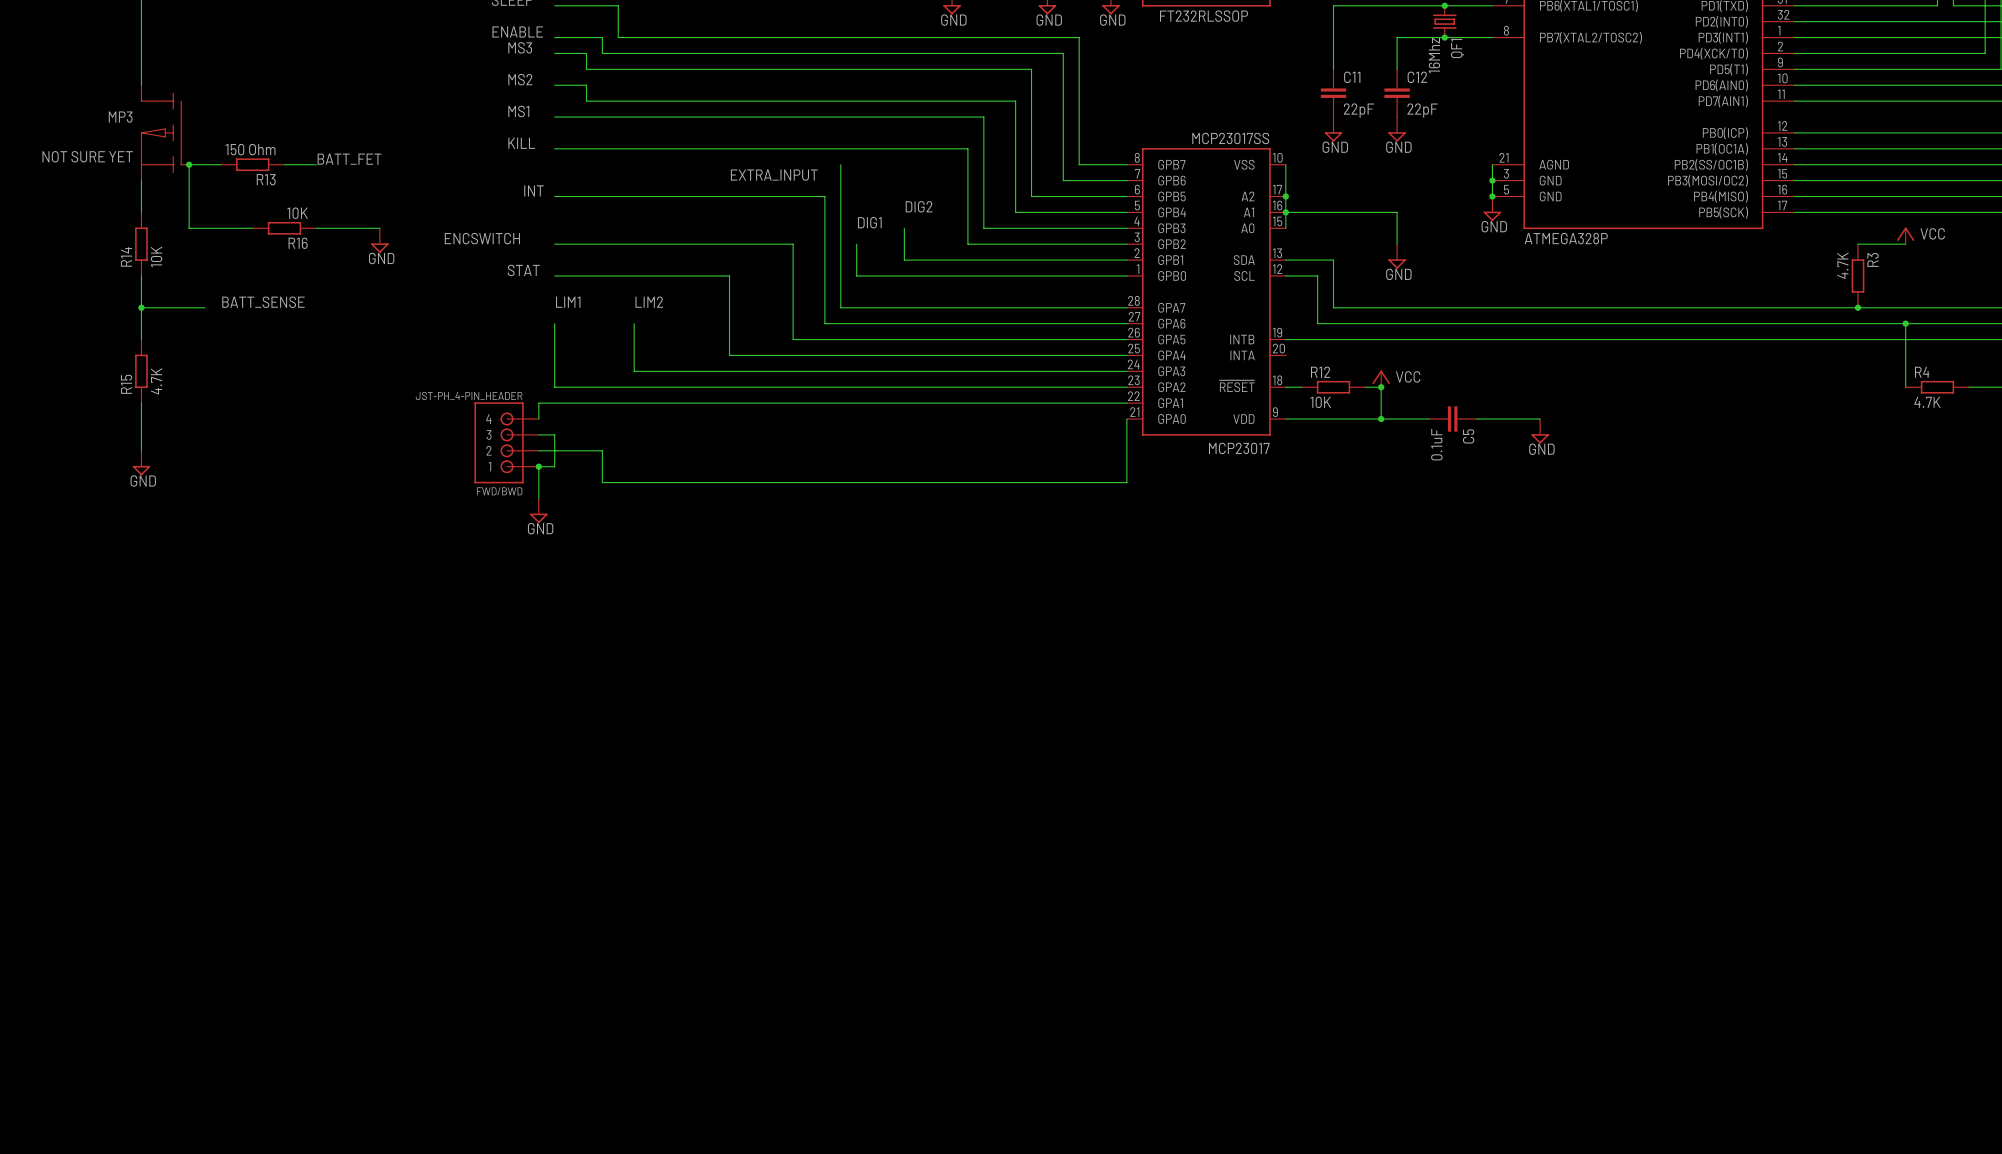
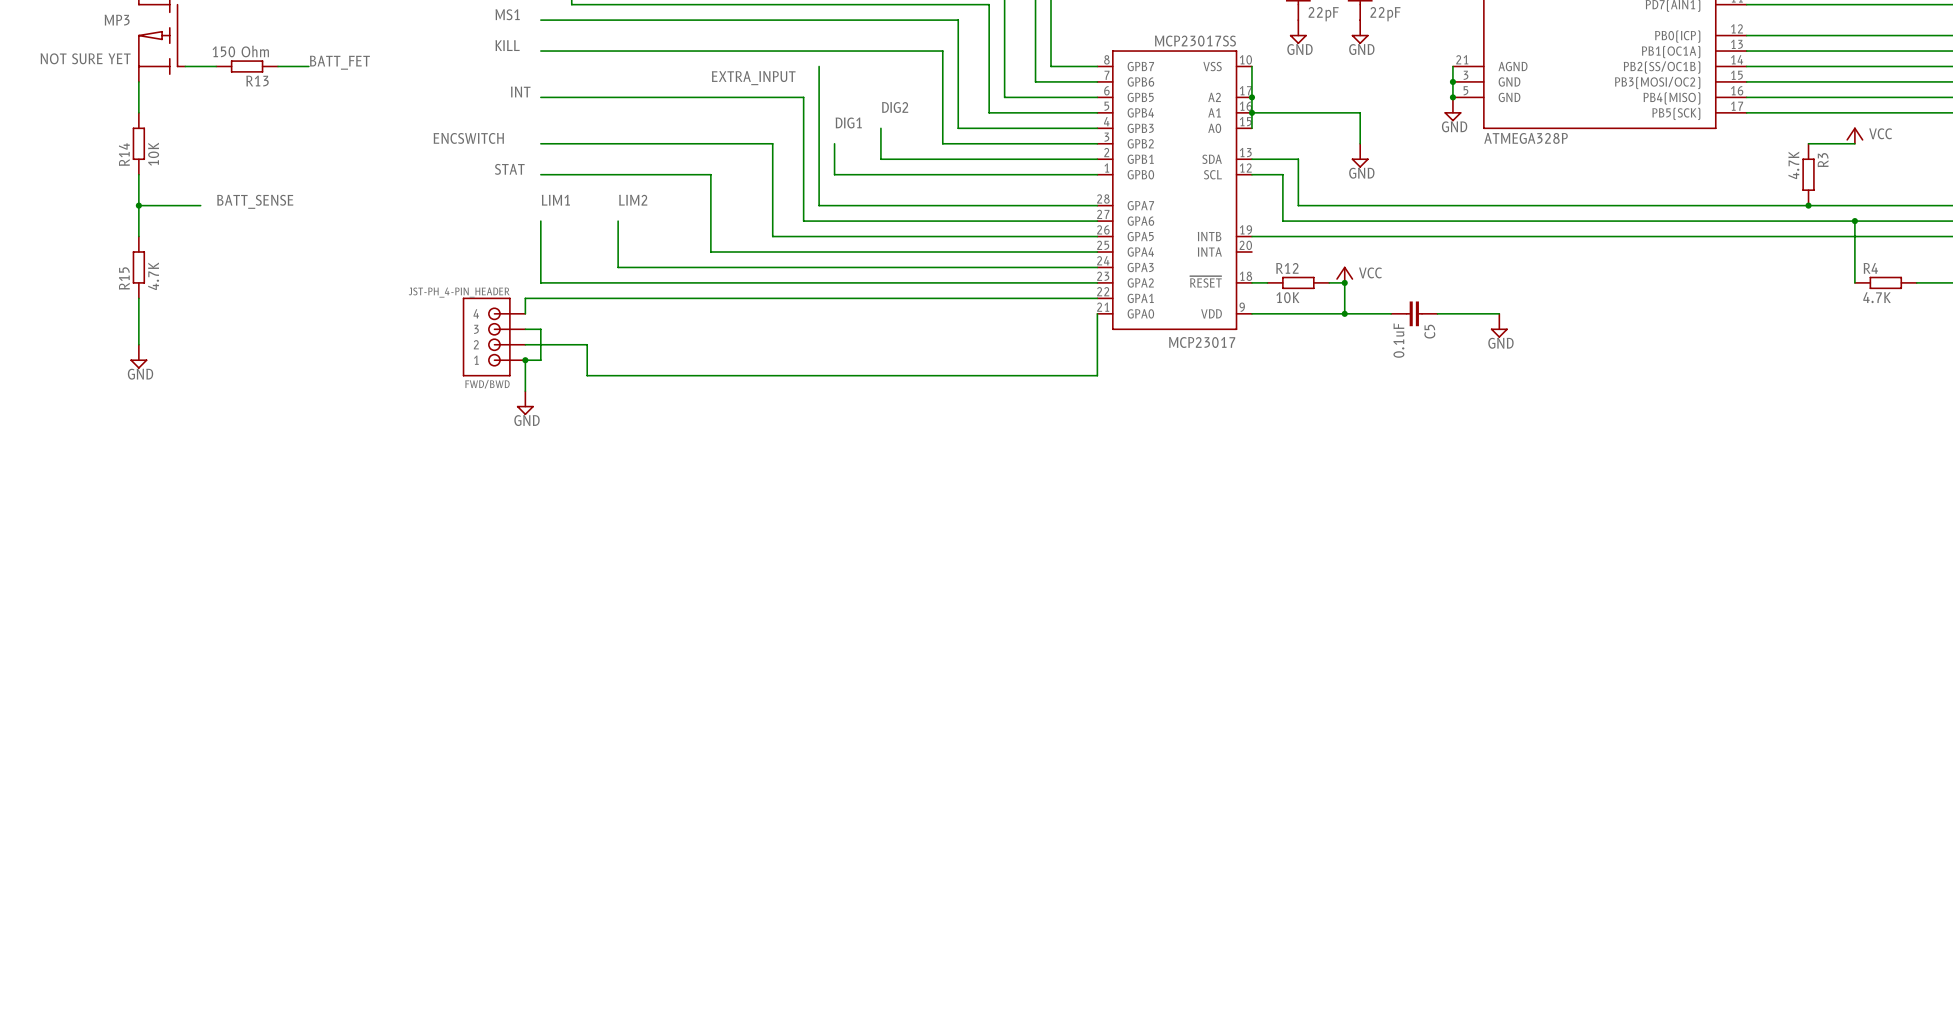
wire: (189, 164) (189, 228) (252, 228) -> none
junction: (189, 164) -> none
R16: 10K (284, 228) -> none
wire: (316, 228) (379, 228) -> none
power symbol: GND (379, 240) -> none

